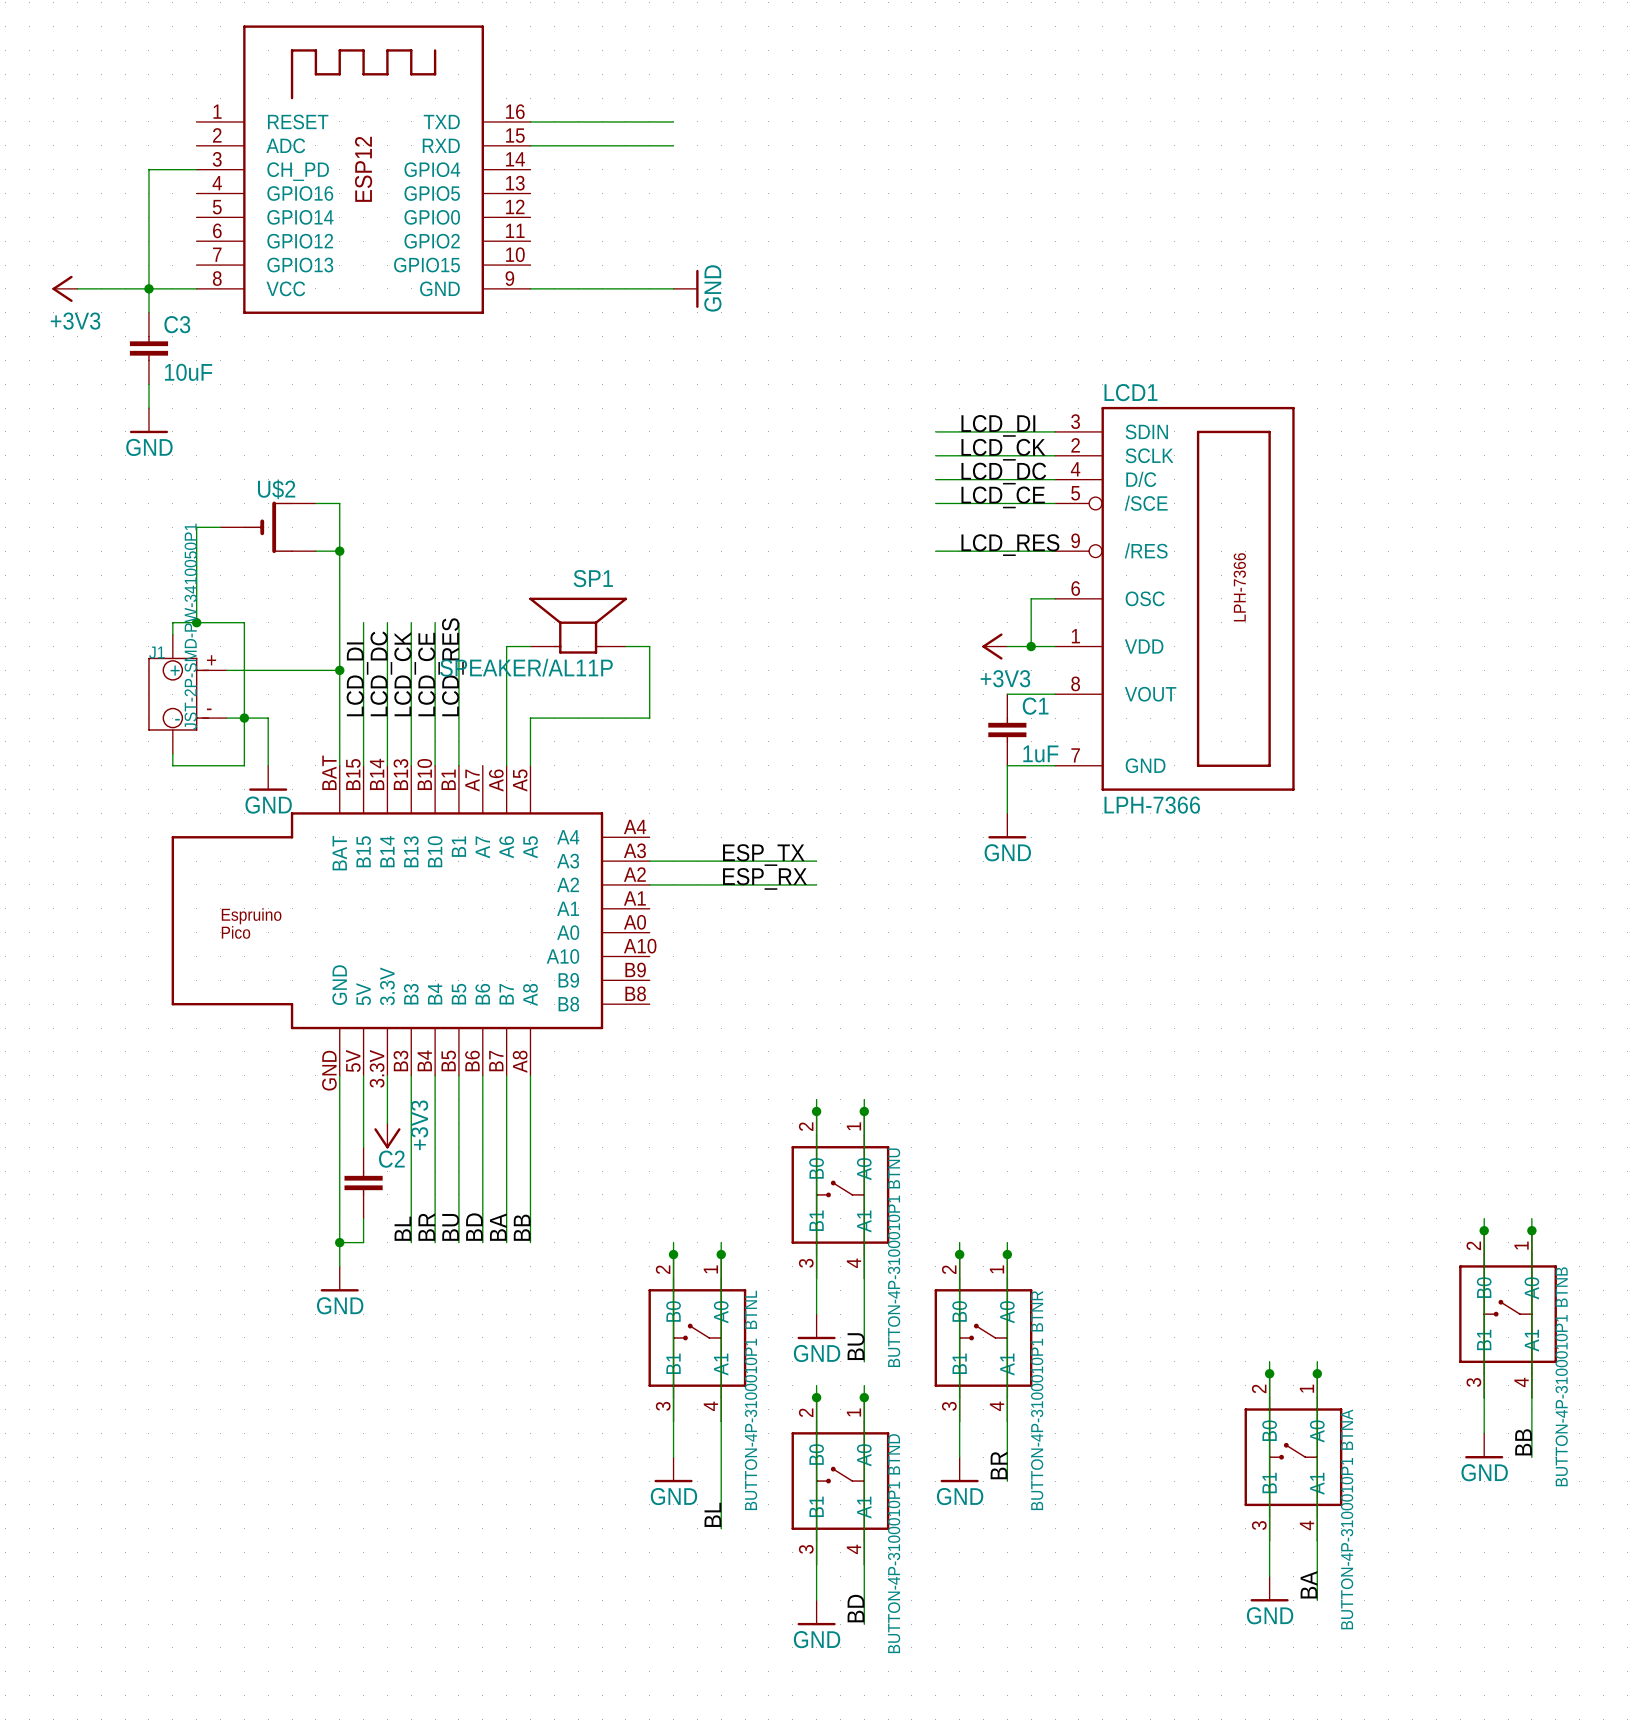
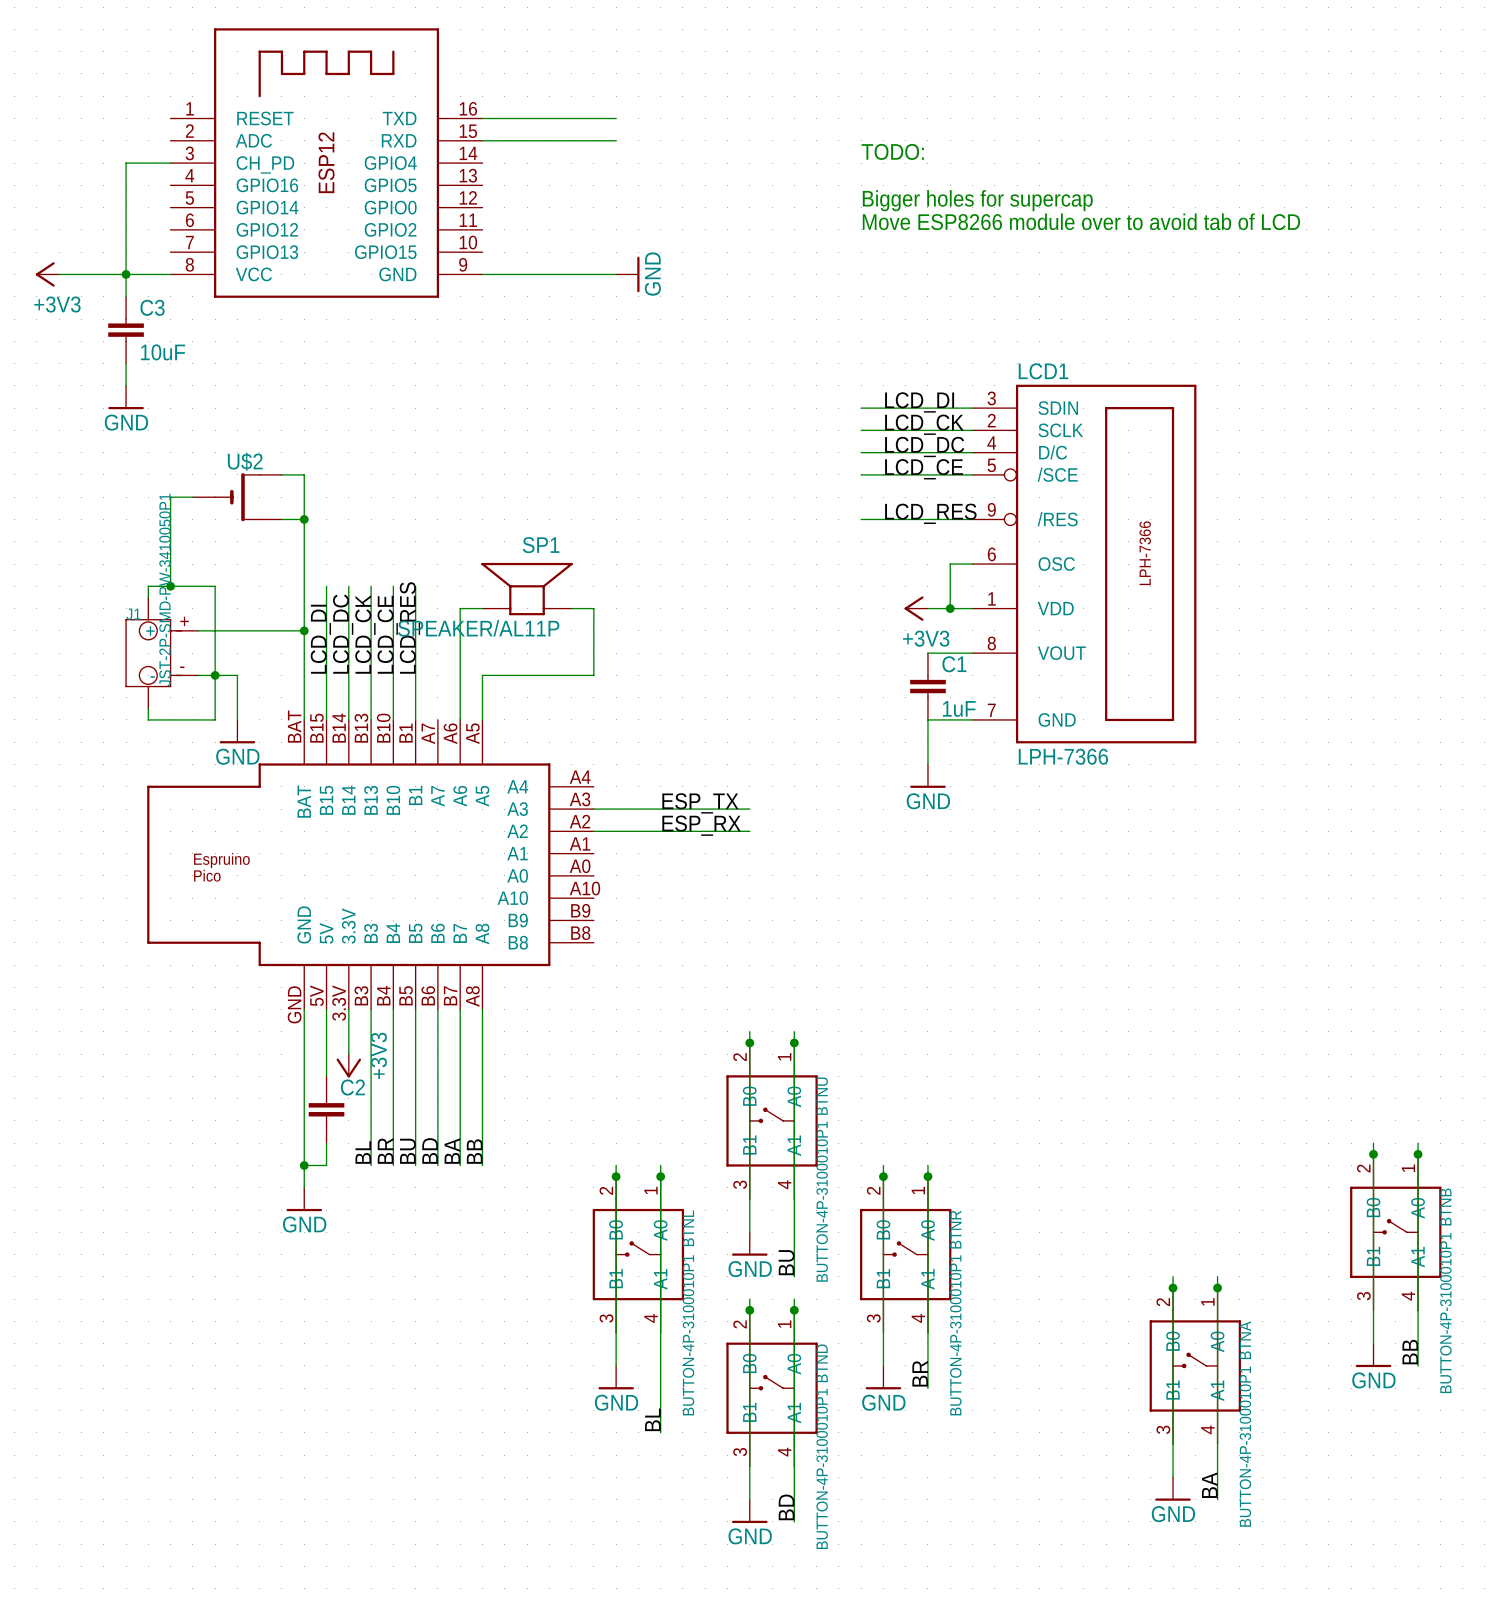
text: none -> TODO: (892, 151)
text: none -> Bigger holes for supercap (977, 200)
text: none -> Move ESP8266 module over to avoid tab of LCD (1081, 221)

